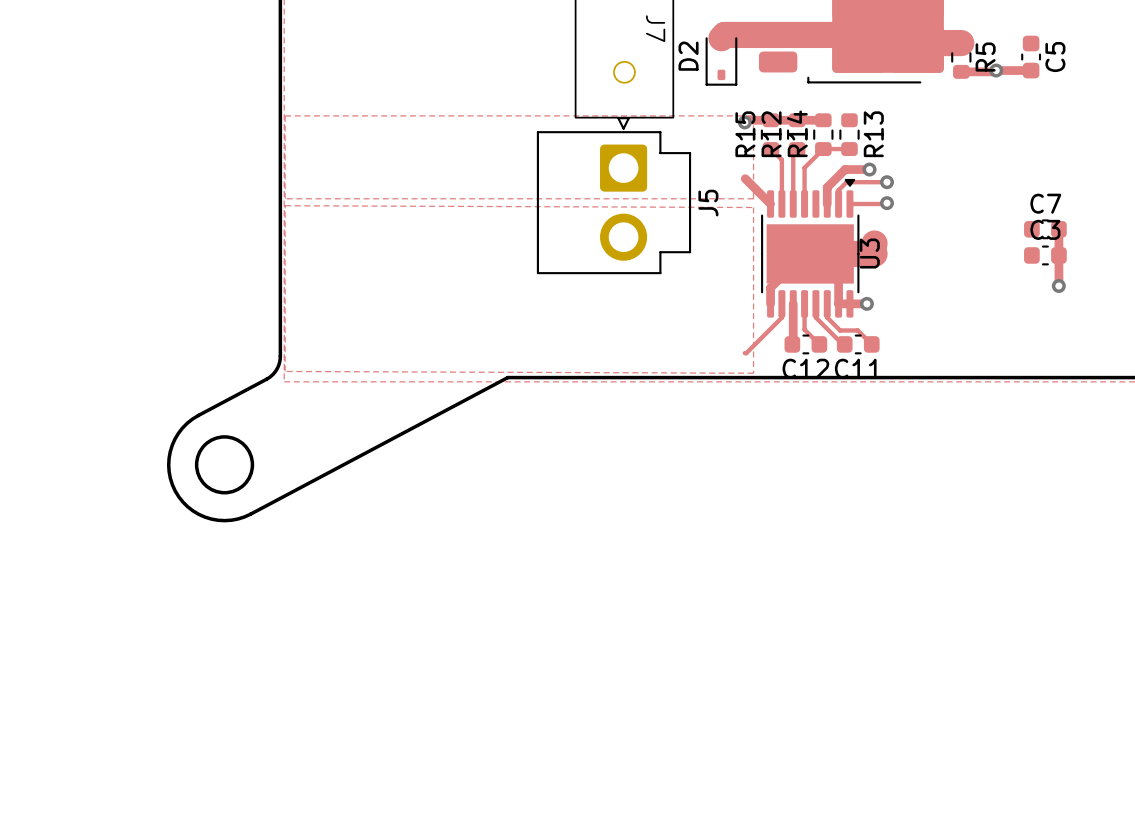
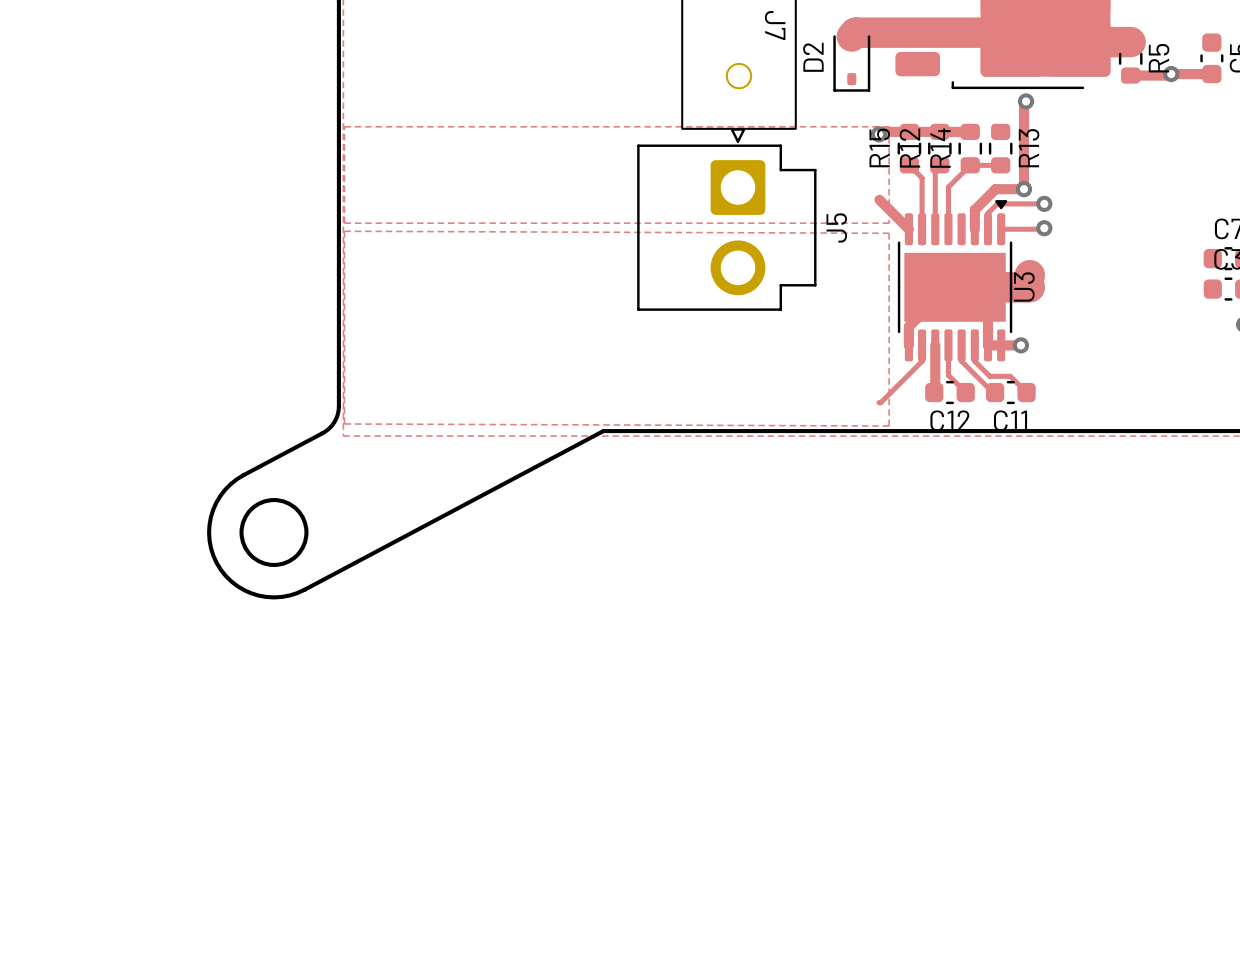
track: none -> (1026, 101) (1024, 103) (1024, 189)
via: none -> (1026, 101)

